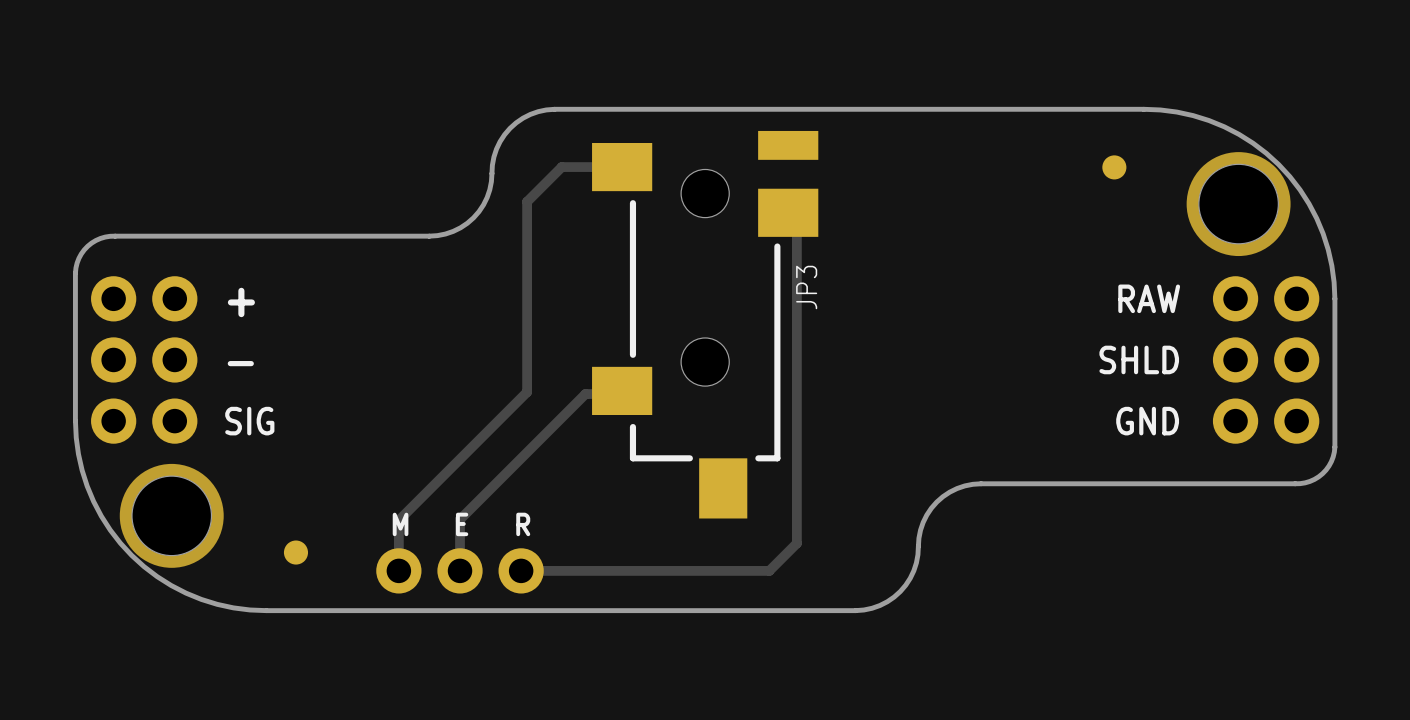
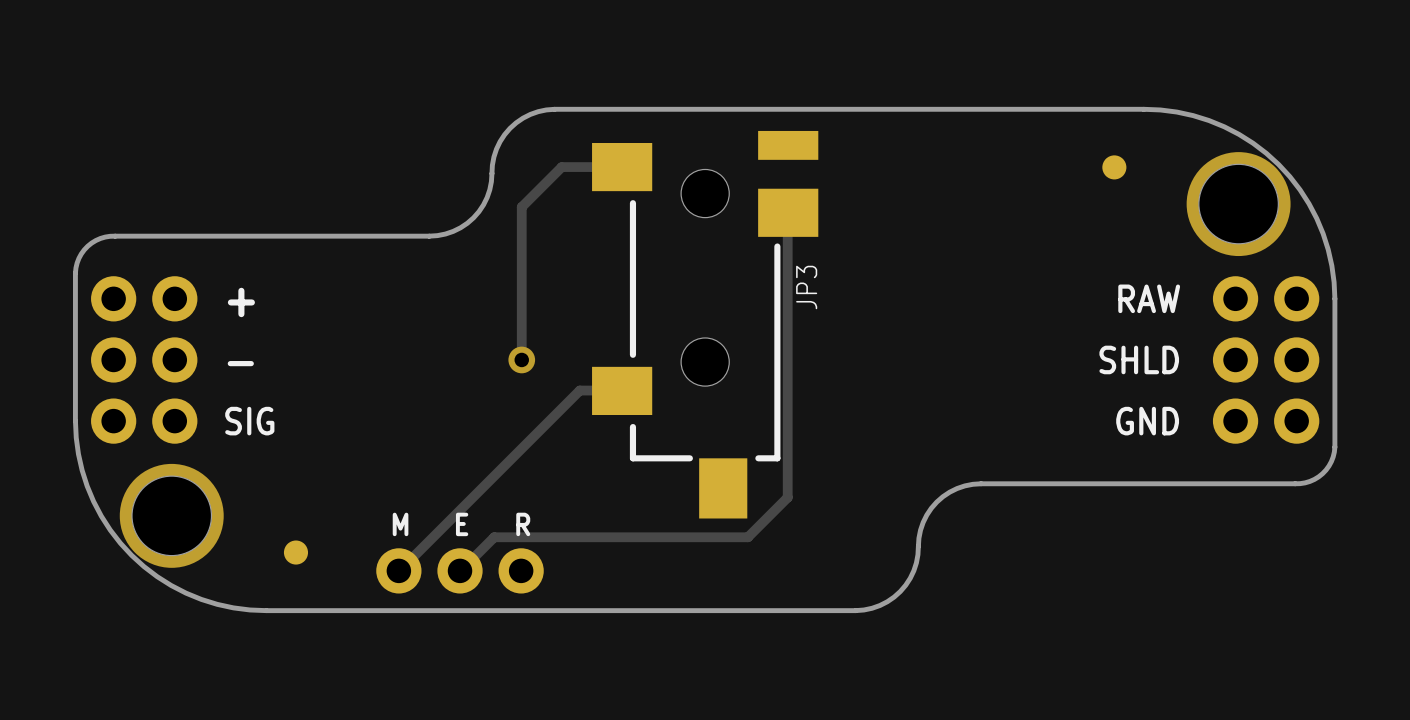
track: (527, 201) (527, 392) (398, 520) (398, 570) -> (527, 201) (521, 207) (521, 359)
track: (788, 212) (793, 212) (796, 216) (796, 543) (769, 570) (521, 570) -> (788, 212) (787, 497) (747, 537) (494, 537) (460, 570)
via: none -> (521, 359)
track: (622, 390) (622, 394) (585, 394) (460, 519) (460, 570) -> (622, 390) (579, 390) (398, 570)

